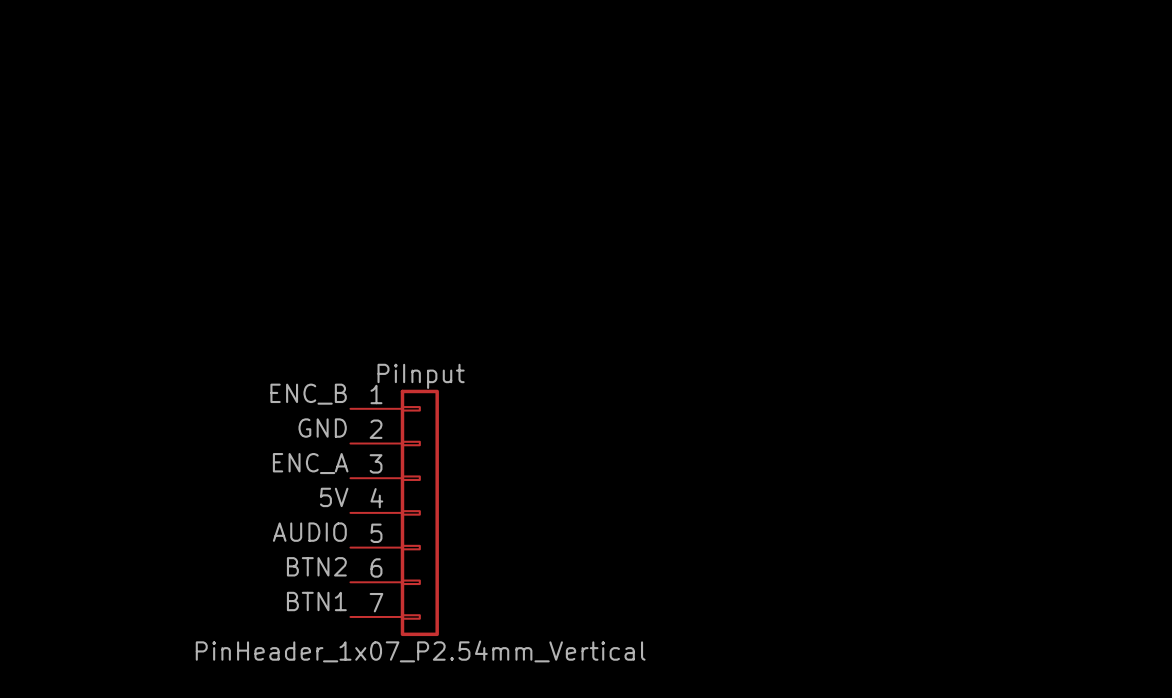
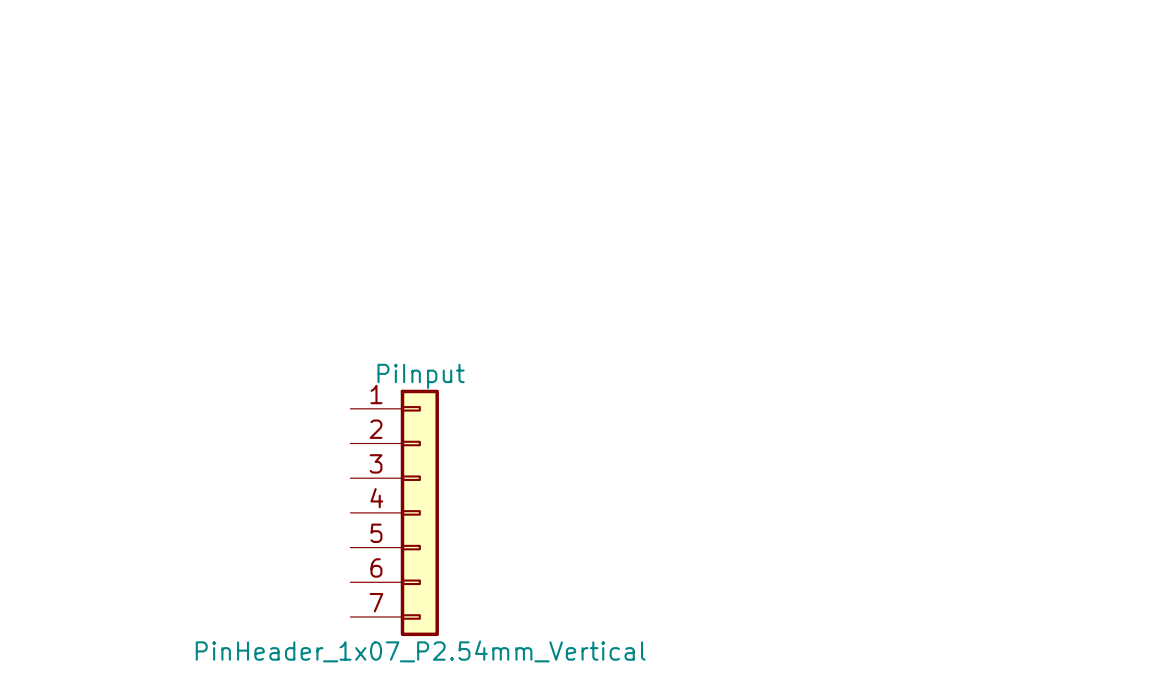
label: ENC_B (308, 394) -> none
label: GND (322, 428) -> none
label: ENC_A (310, 463) -> none
label: 5V (334, 497) -> none
label: AUDIO (309, 532) -> none
label: BTN2 (316, 566) -> none
label: BTN1 (316, 601) -> none

